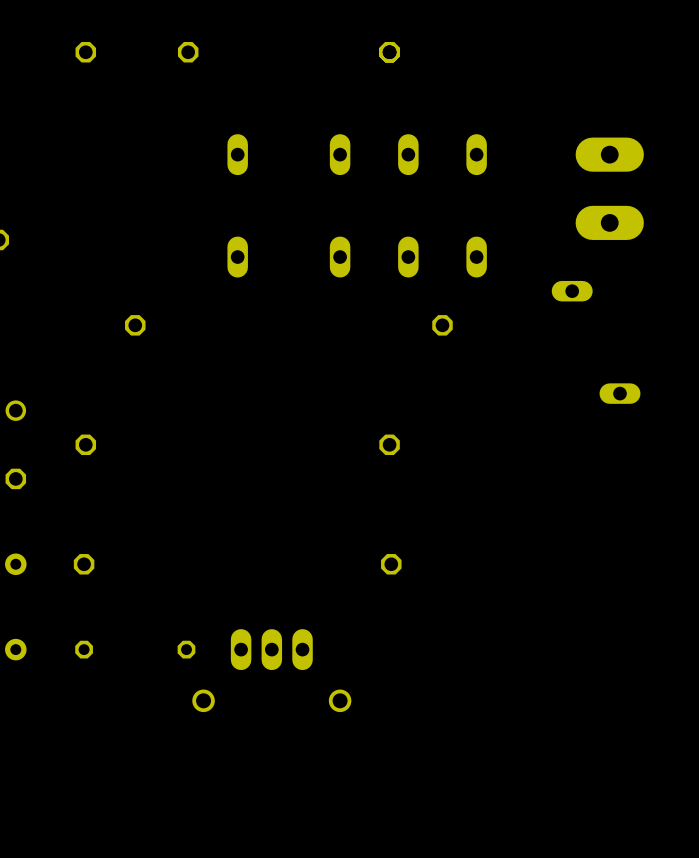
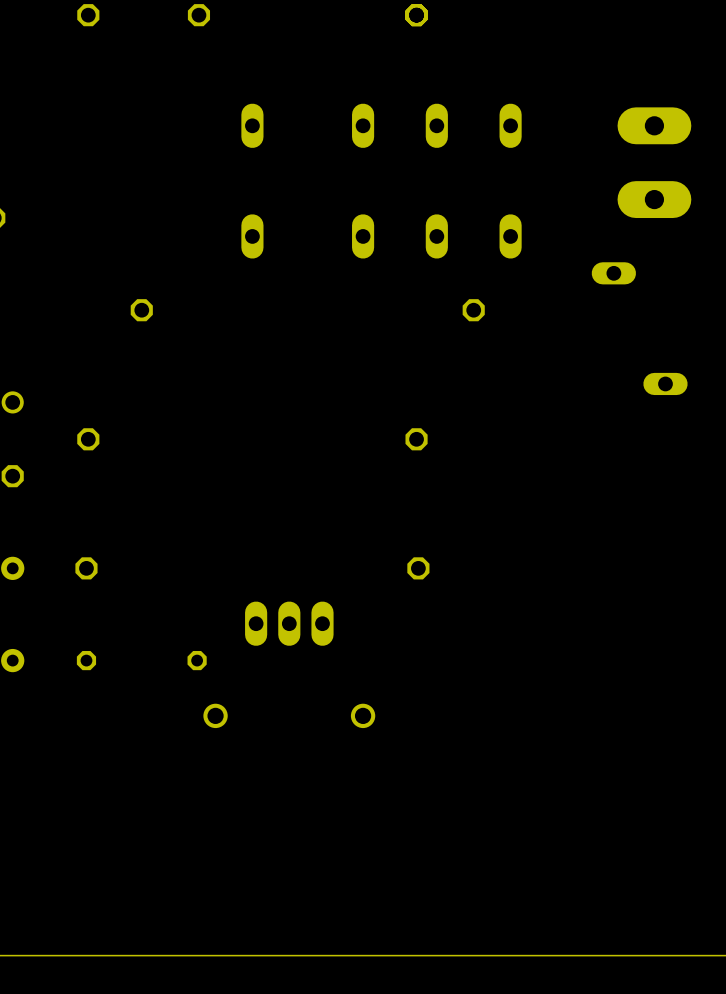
part position: (271, 649) -> (289, 623)

